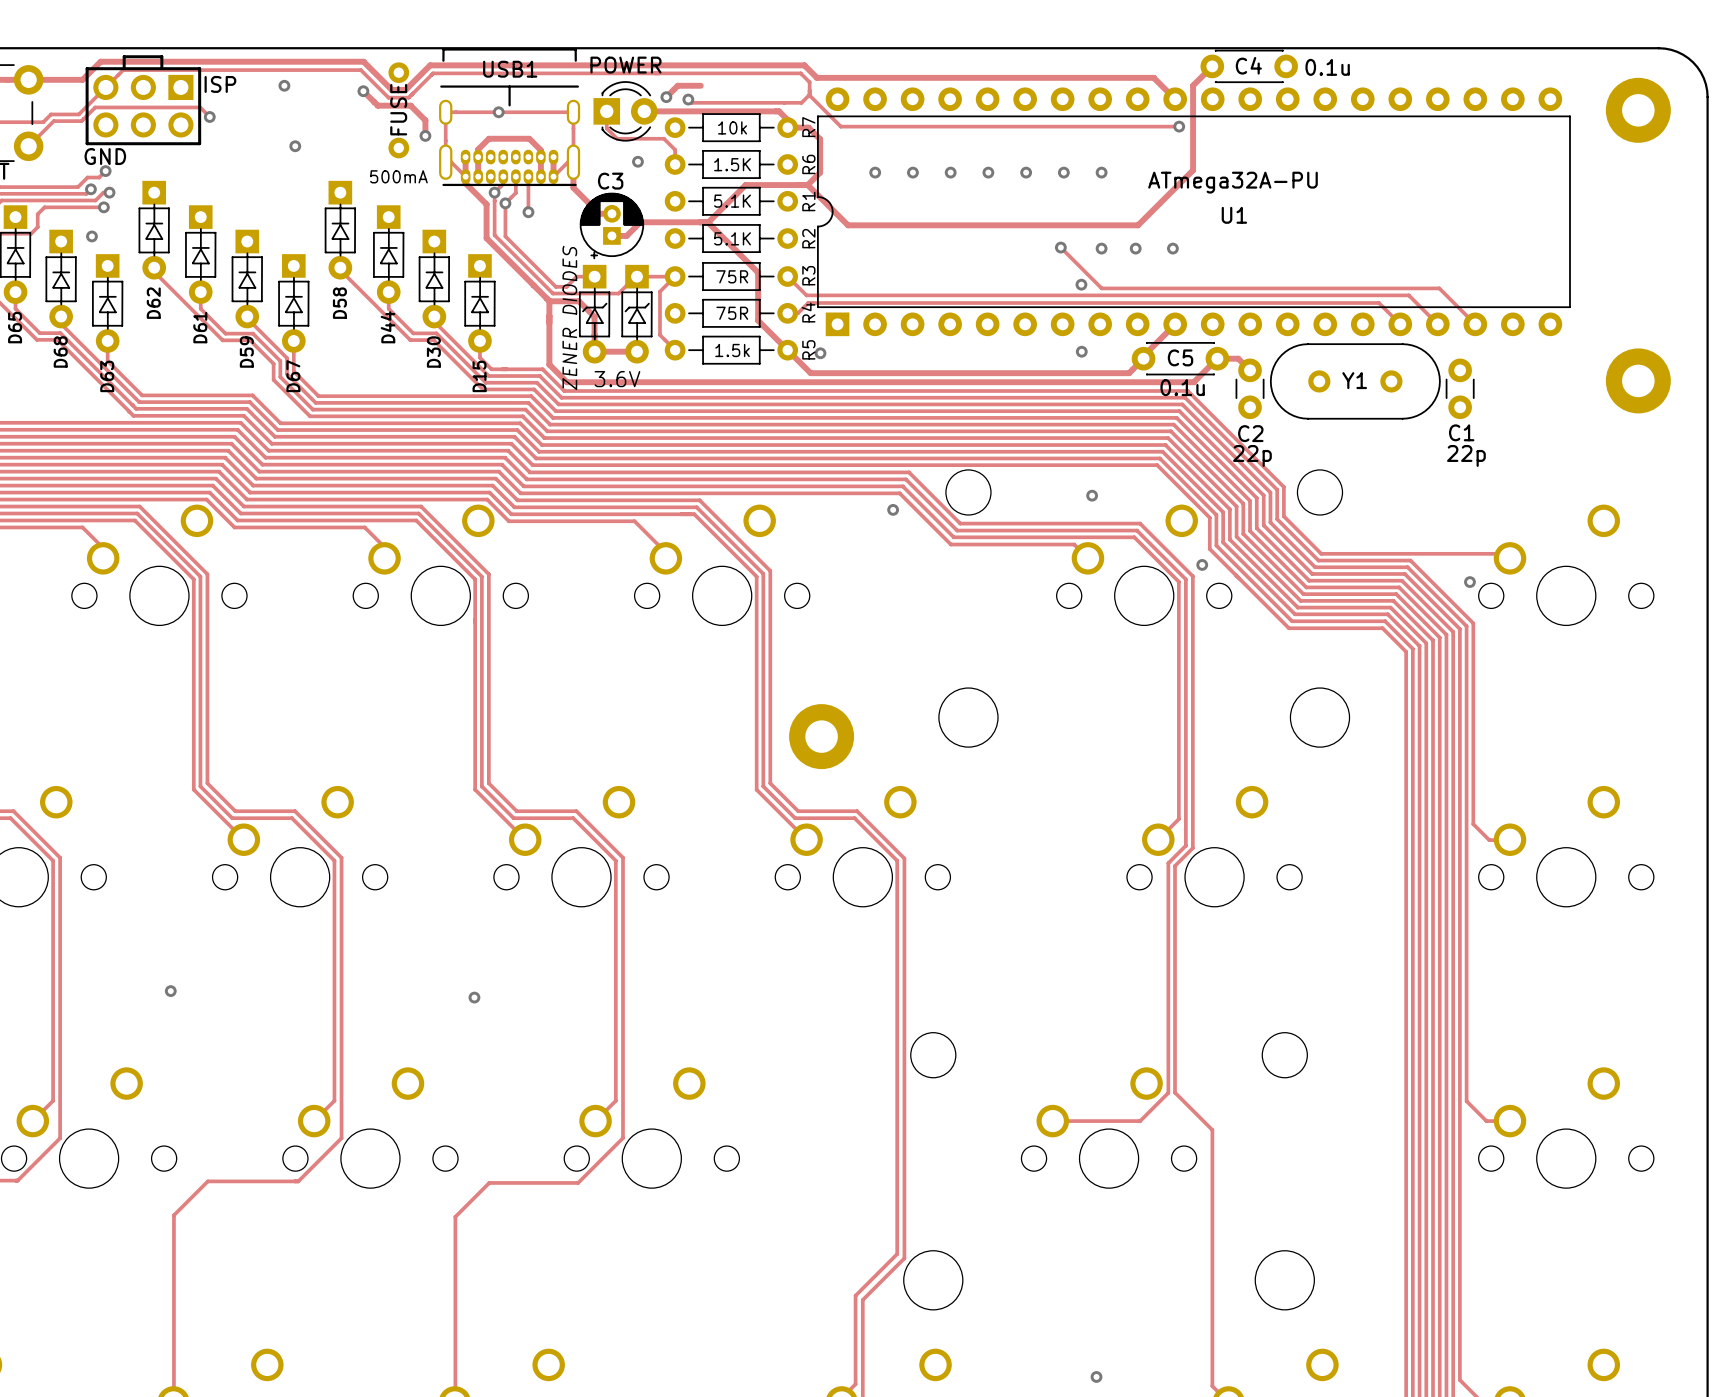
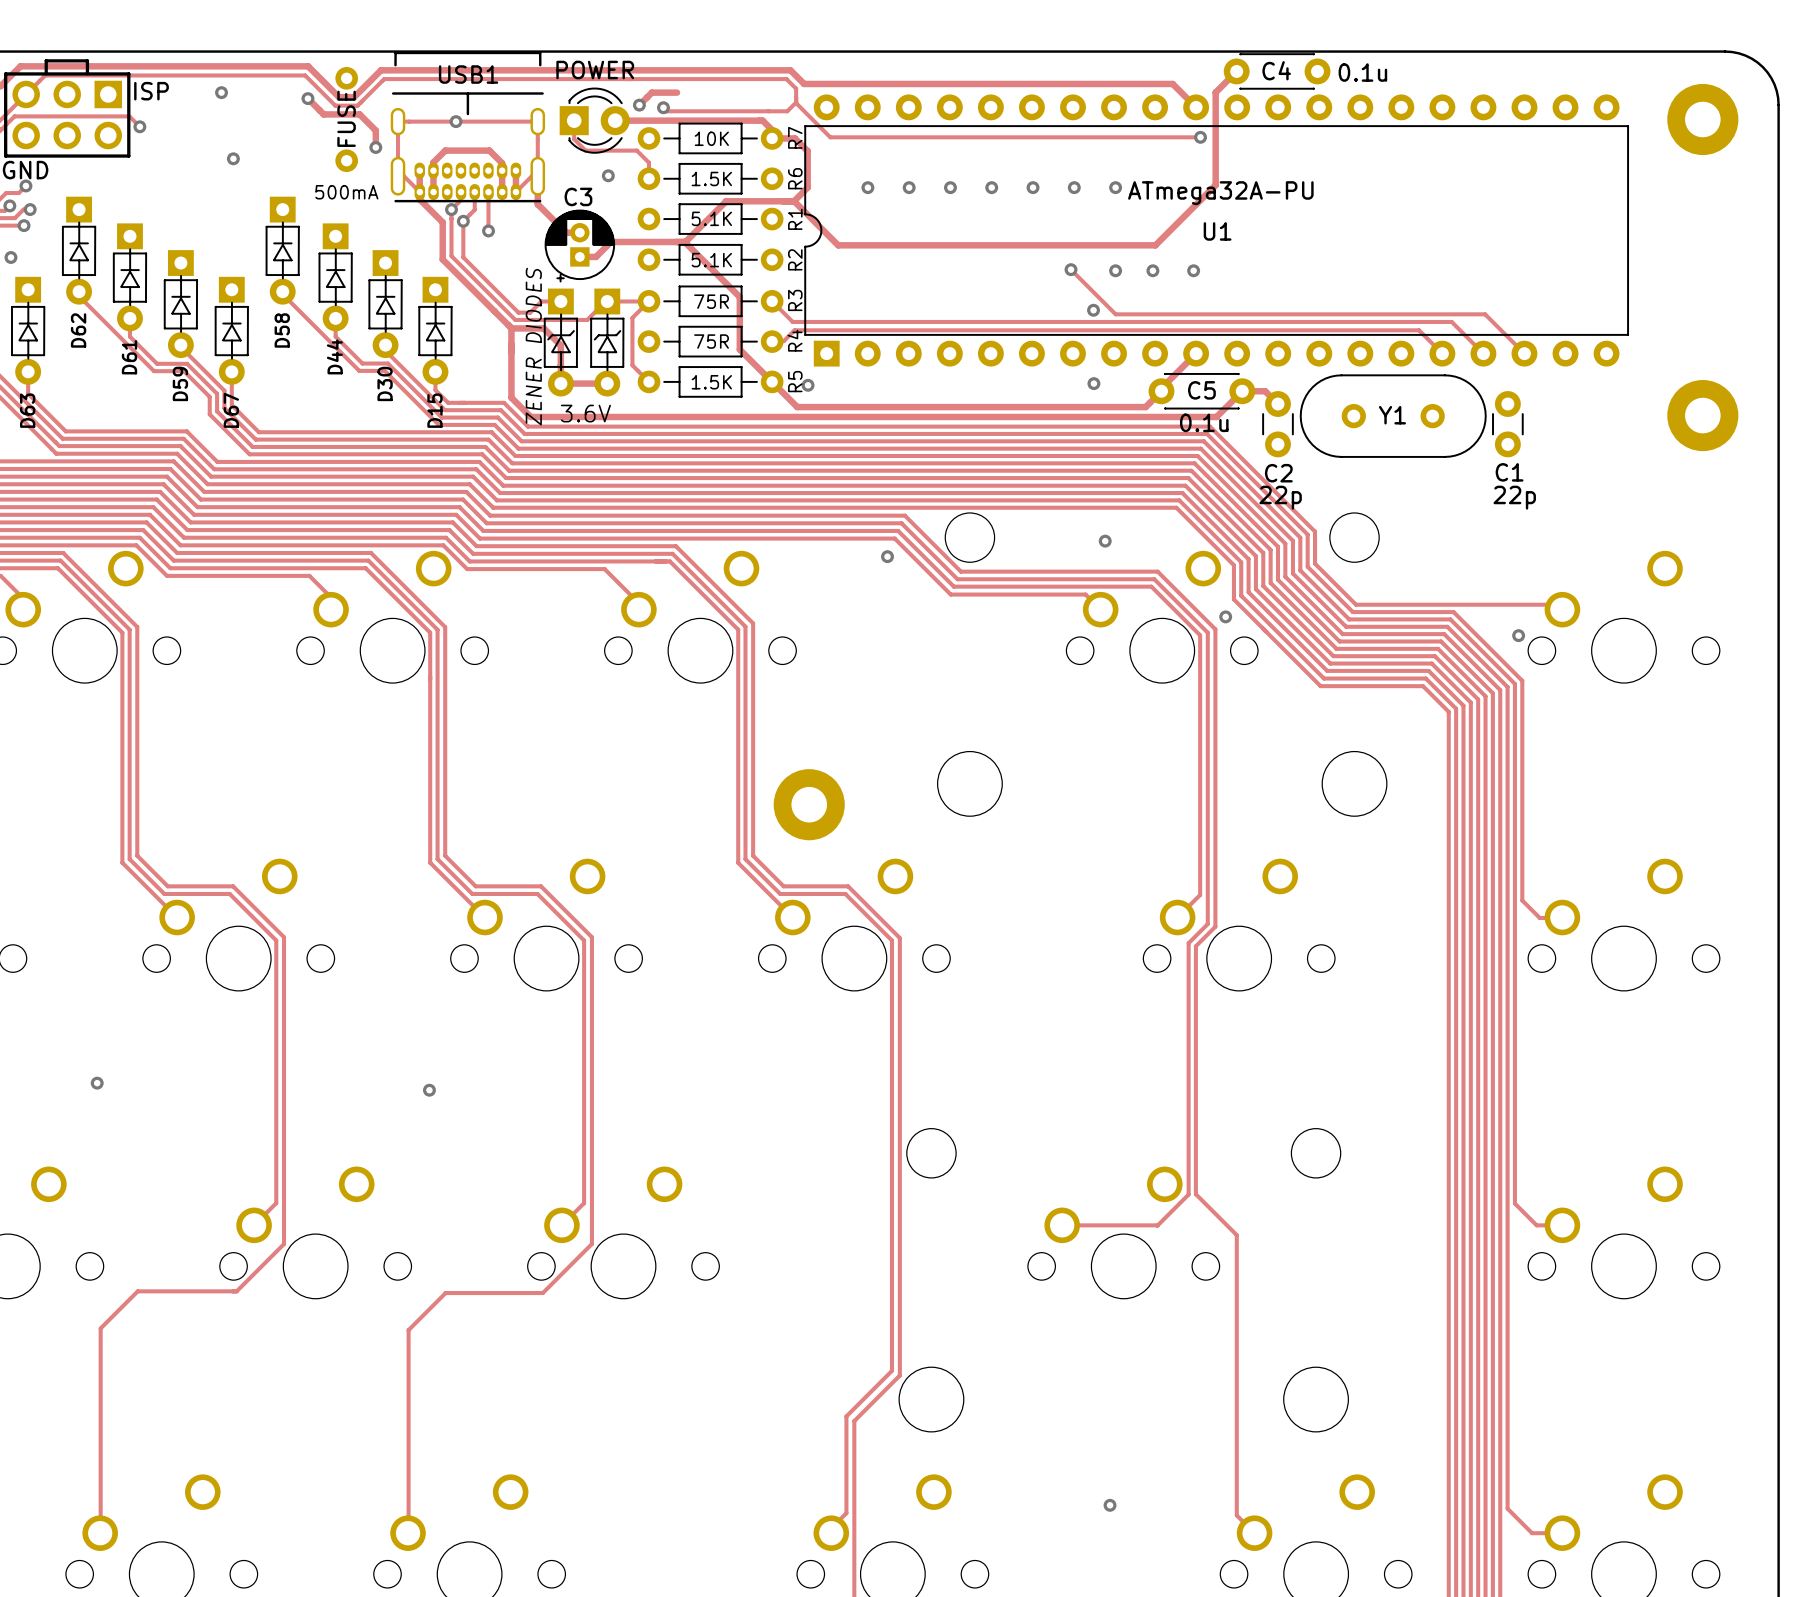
R7 value: 10k (732, 127) -> 10K (711, 138)
U1 value position: ATmega32A-PU (1233, 182) -> ATmega32A-PU (1220, 193)
U1 name position: U1 (1234, 215) -> U1 (1217, 231)
R5 value: 1.5k (732, 350) -> 1.5K (711, 382)

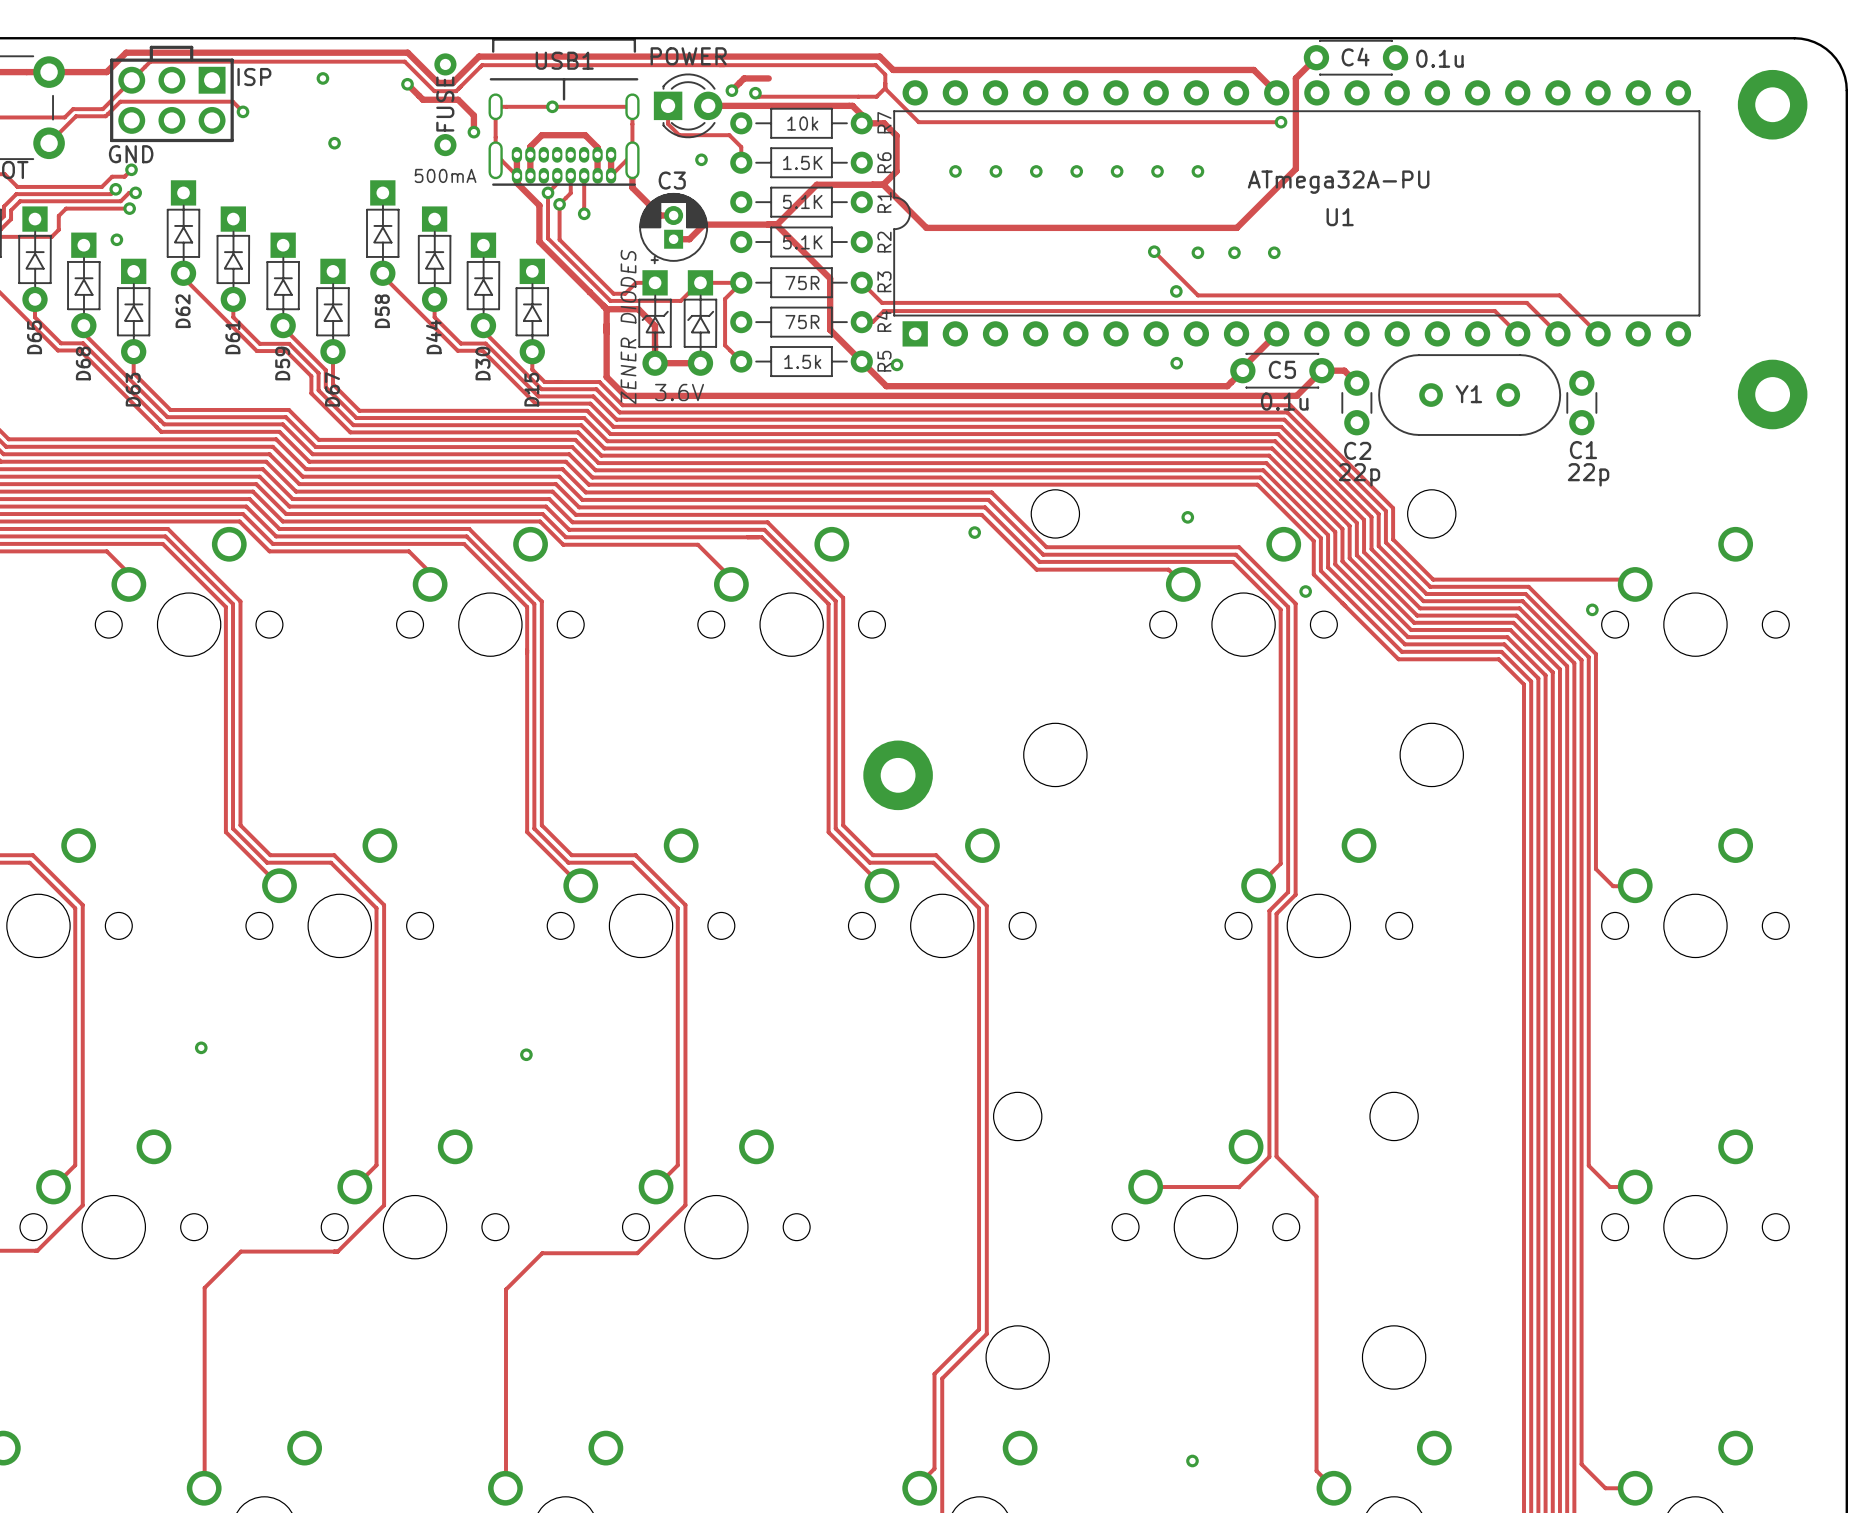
R7 value: 10K (711, 138) -> 10k (802, 123)
U1 value position: ATmega32A-PU (1220, 193) -> ATmega32A-PU (1338, 182)
U1 name position: U1 (1217, 231) -> U1 (1340, 217)
R5 value: 1.5K (711, 382) -> 1.5k (802, 361)

